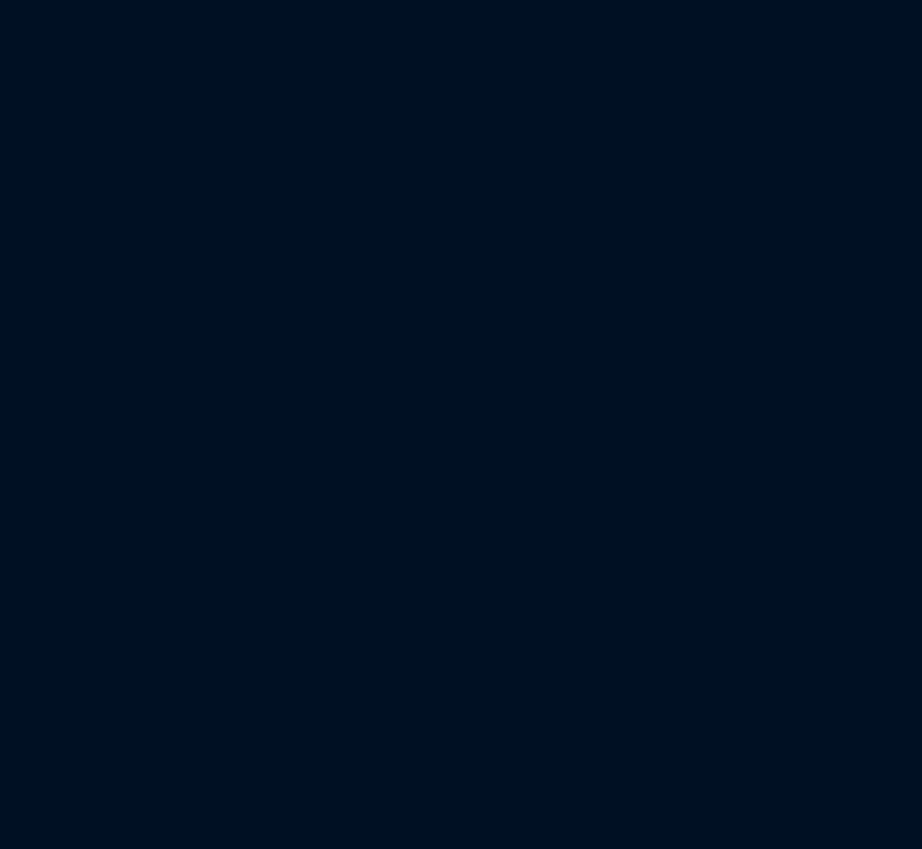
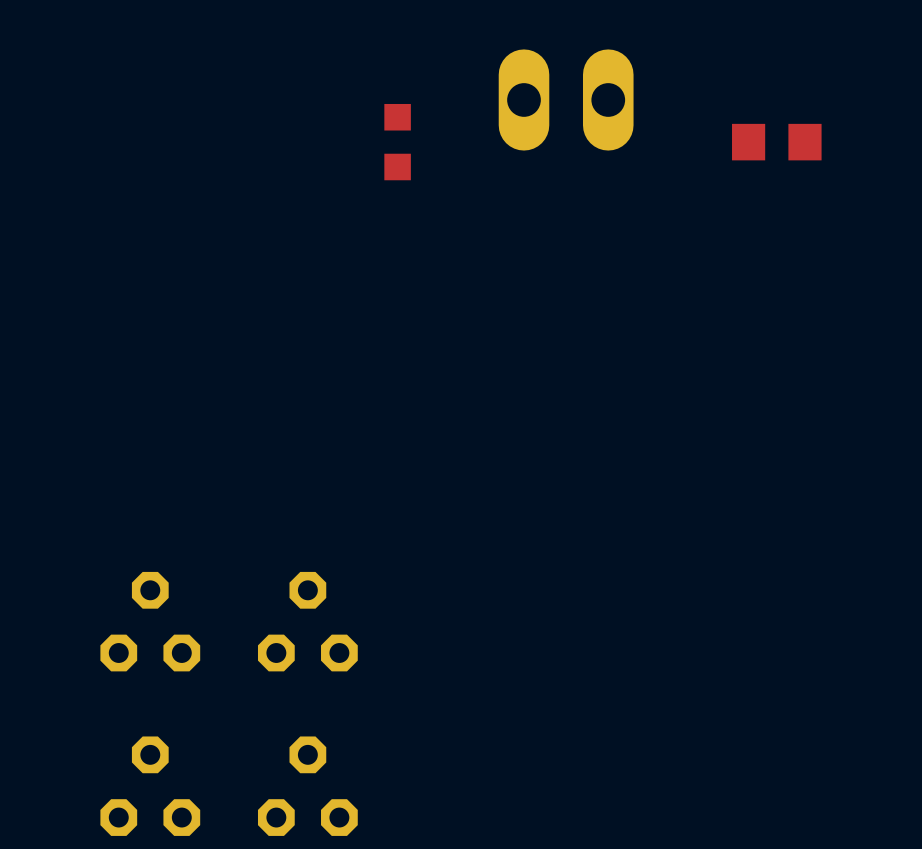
part: none -> (566, 99)
part: none -> (397, 142)
part: none -> (776, 142)
part: none -> (229, 703)

